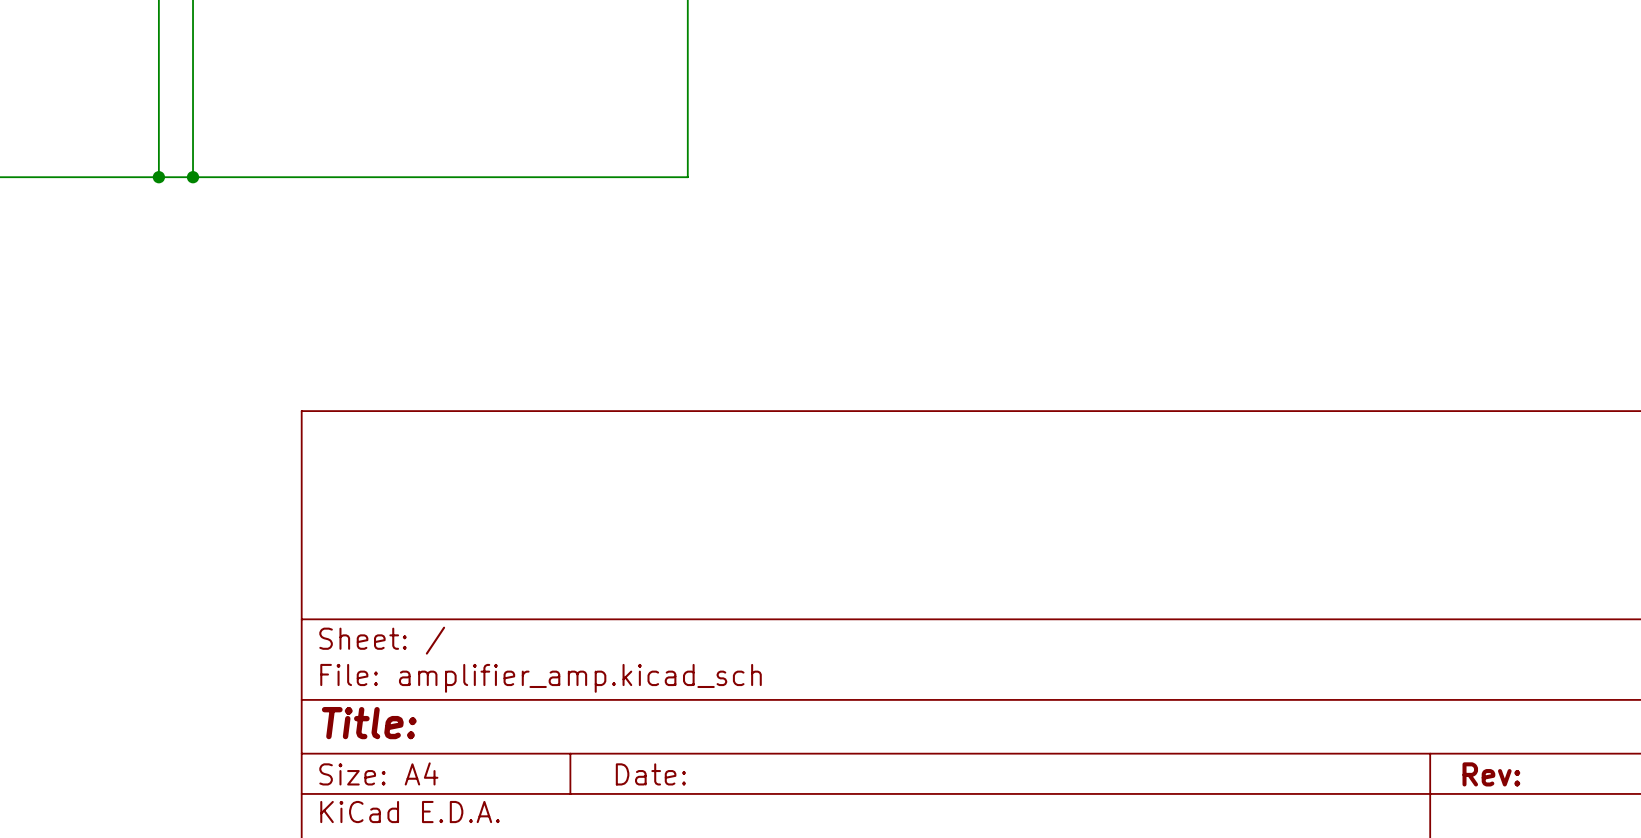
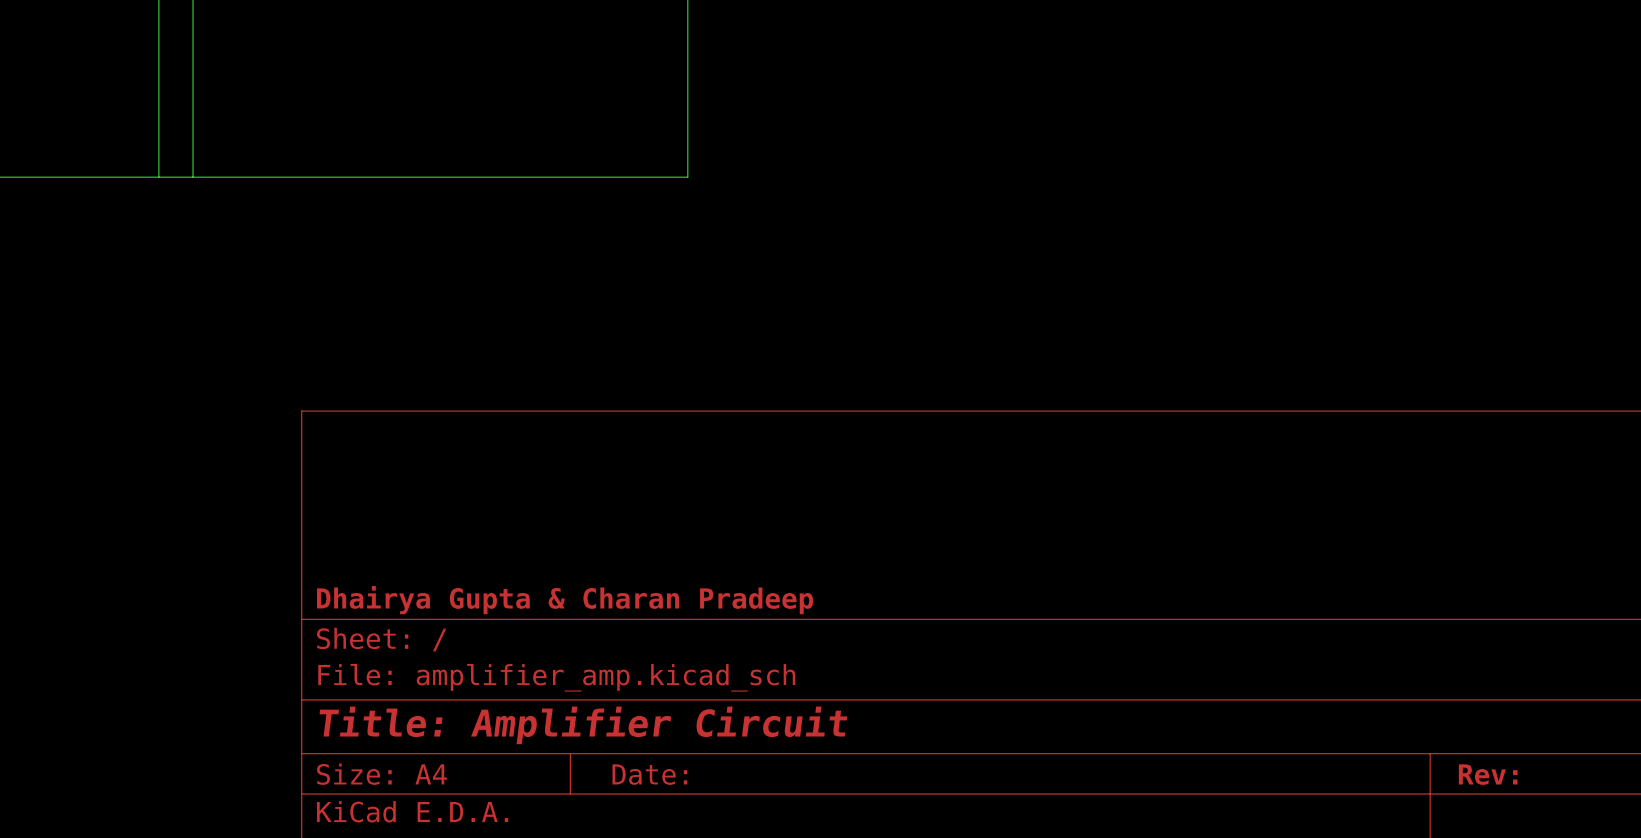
junction: (158, 177) -> none
junction: (193, 177) -> none
title block: none -> Dhairya Gupta & Charan Pradeep (565, 600)
title block: Title: (369, 723) -> Title: Amplifier Circuit (583, 725)

